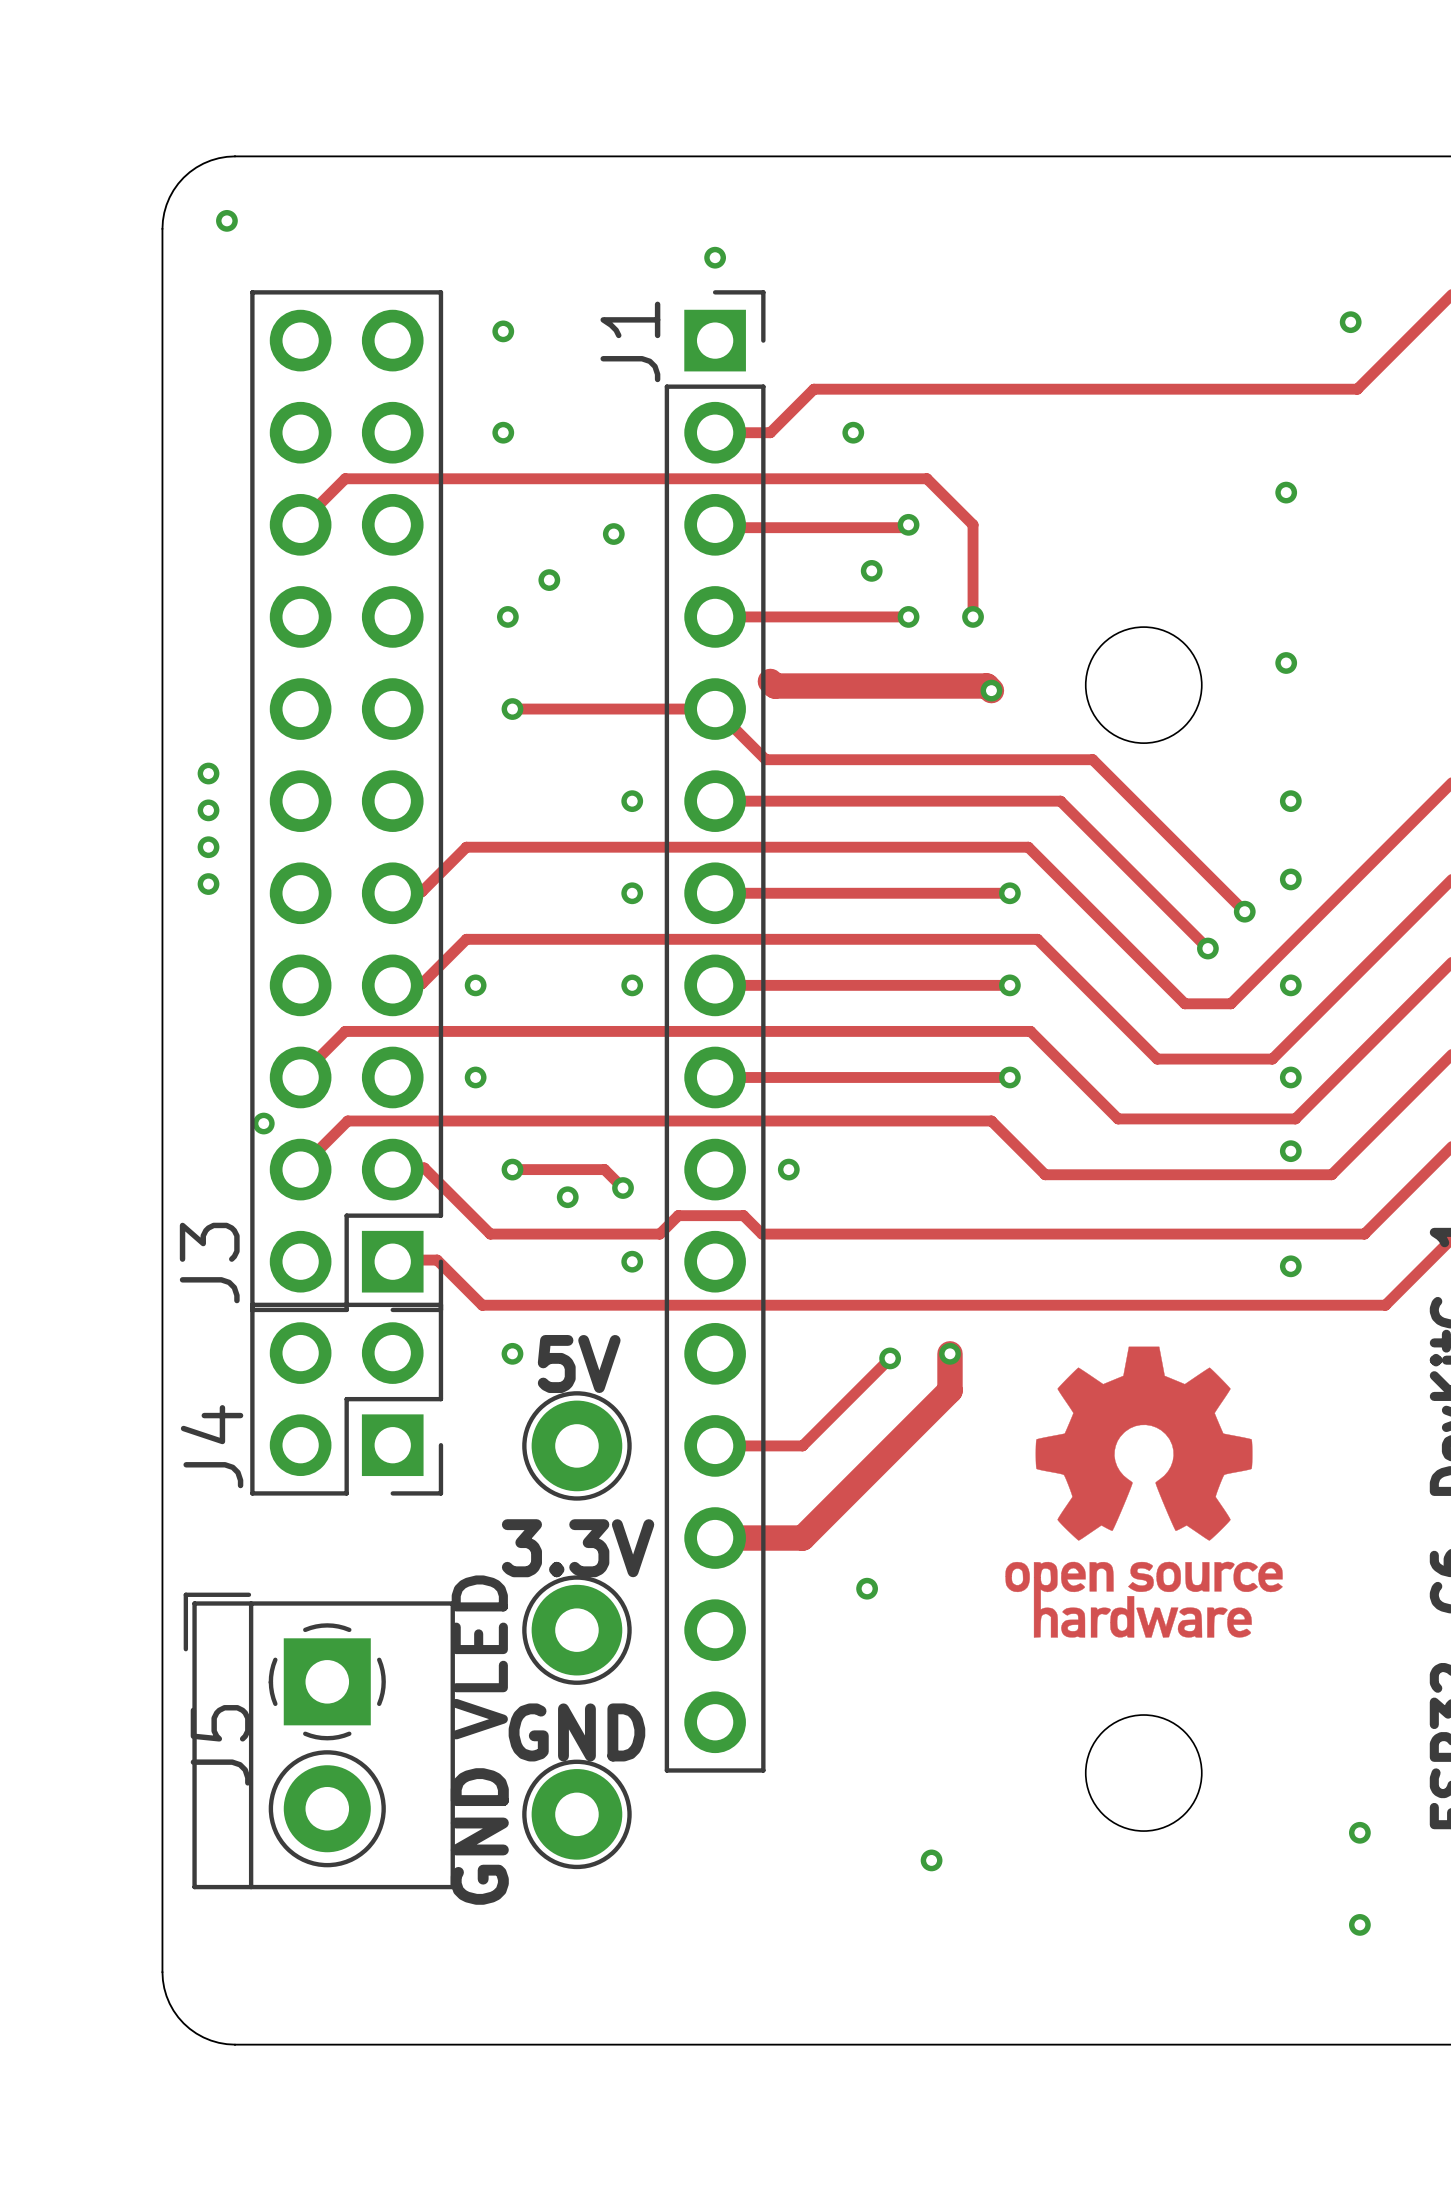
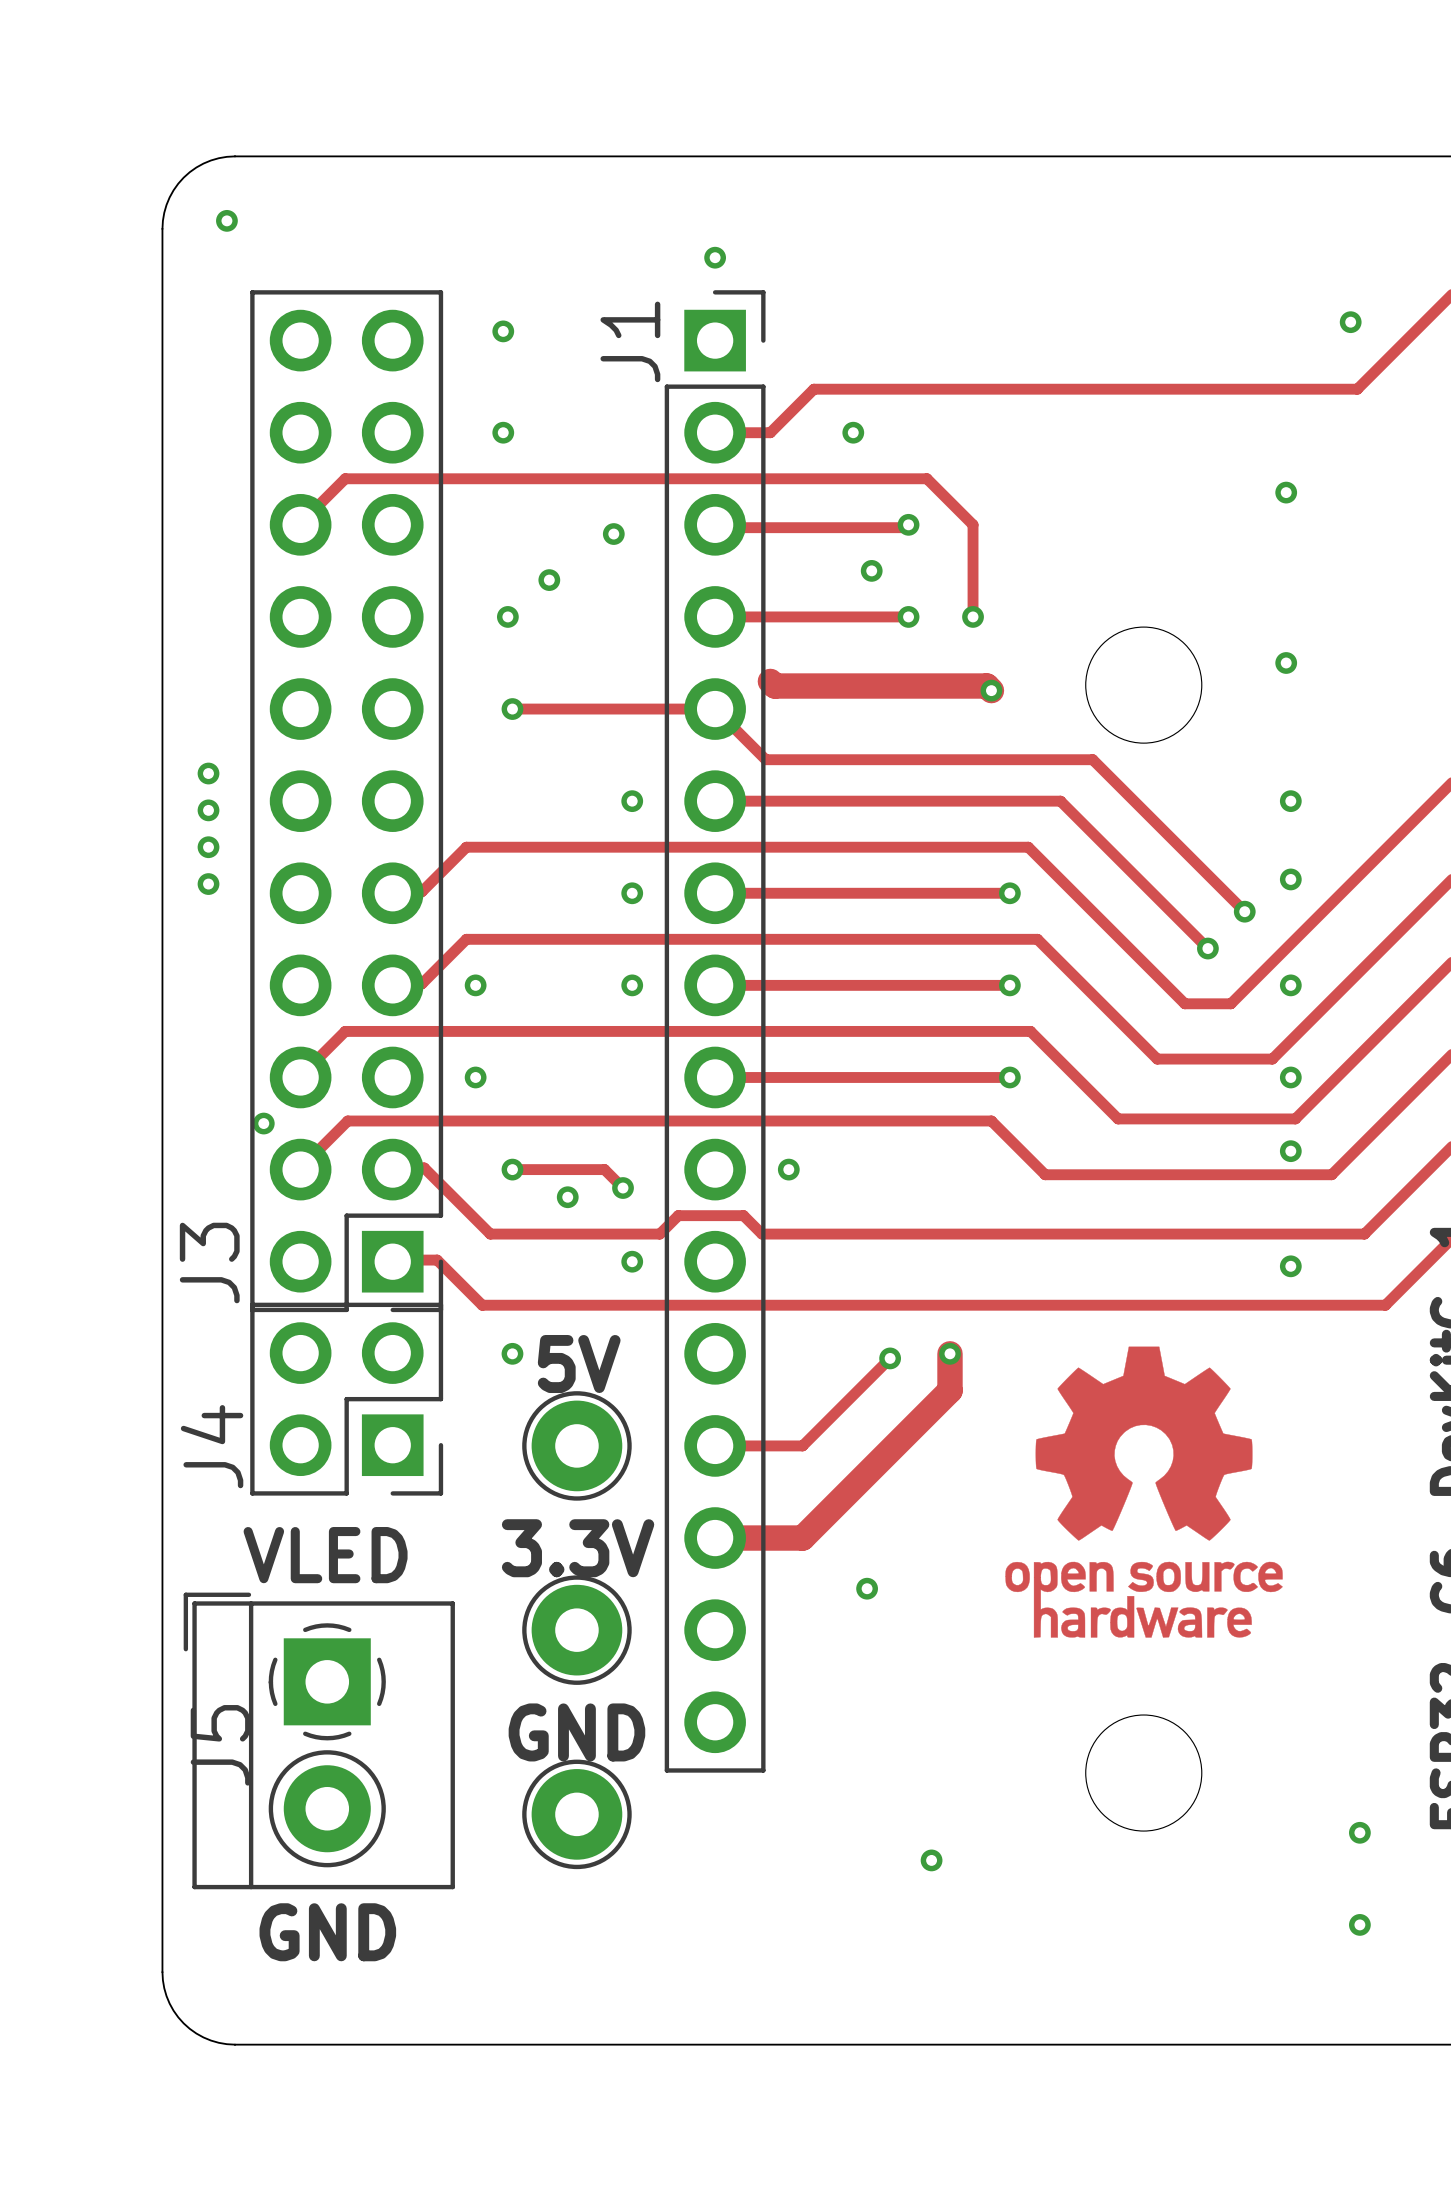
text rotation: 0° (479, 1657) -> 90° clockwise (325, 1555)
text rotation: 0° (479, 1836) -> 90° clockwise (327, 1932)
text position: GND (479, 1836) -> GND (327, 1932)

